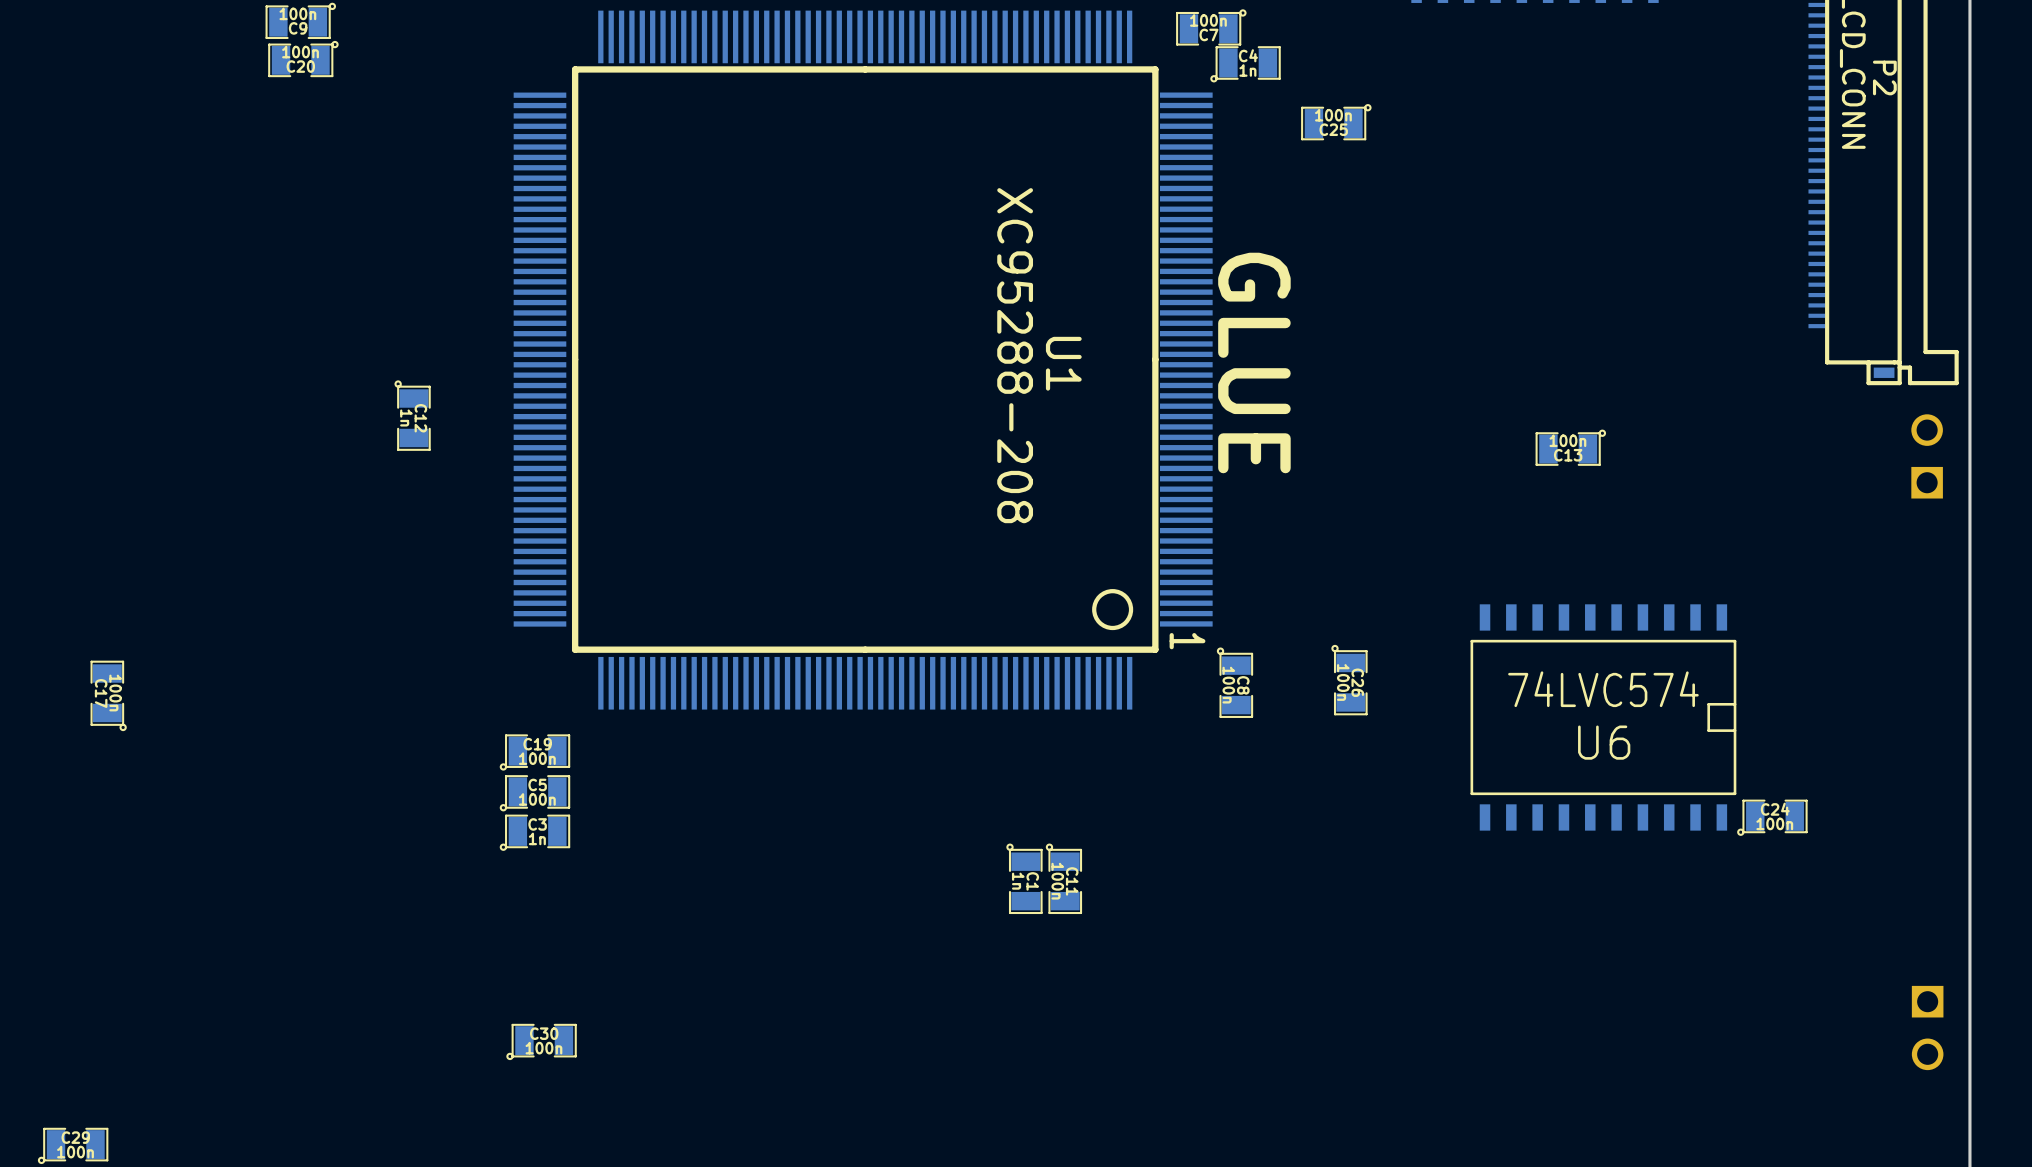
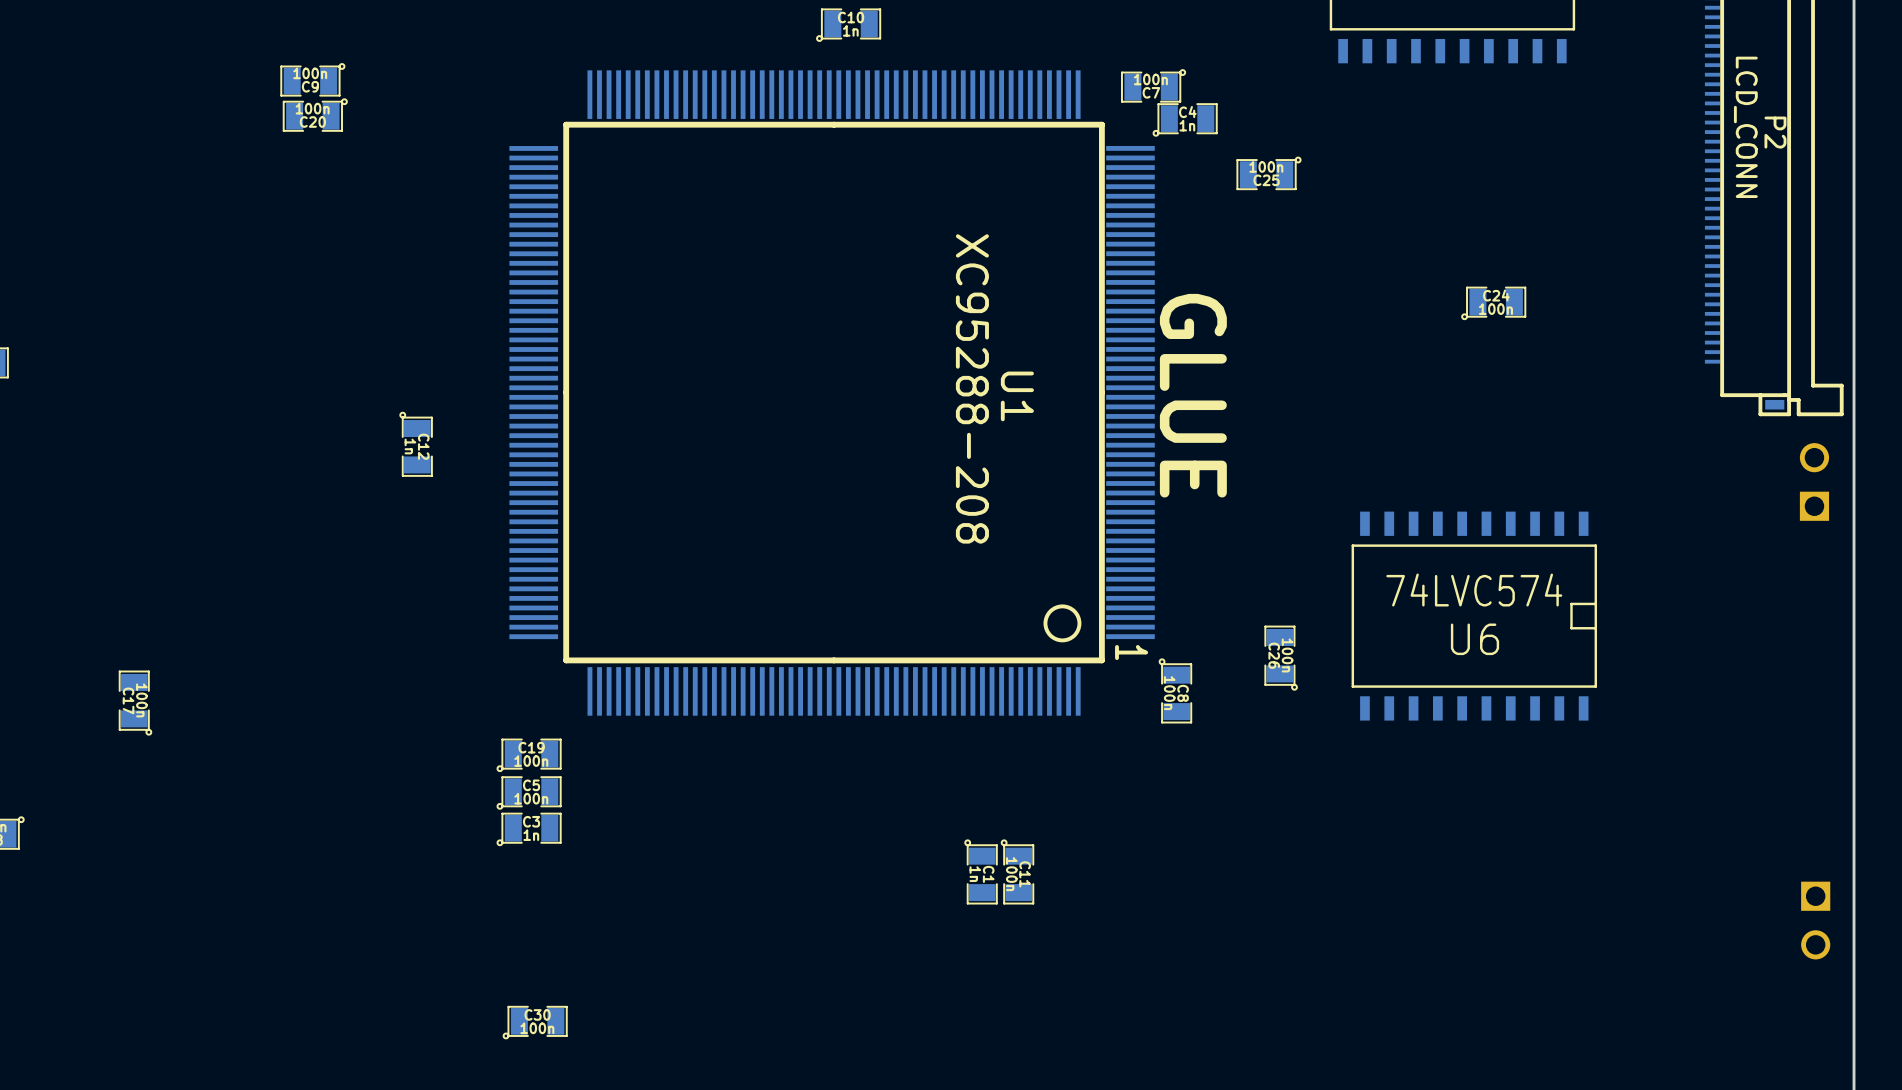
C13: 100n (1570, 447) -> none
C26 rotation: 0° (1349, 680) -> 180° (1281, 658)
U6 position: (1603, 717) -> (1474, 616)
C24 position: (1772, 817) -> (1493, 303)
part position: (1927, 1028) -> (1815, 920)

